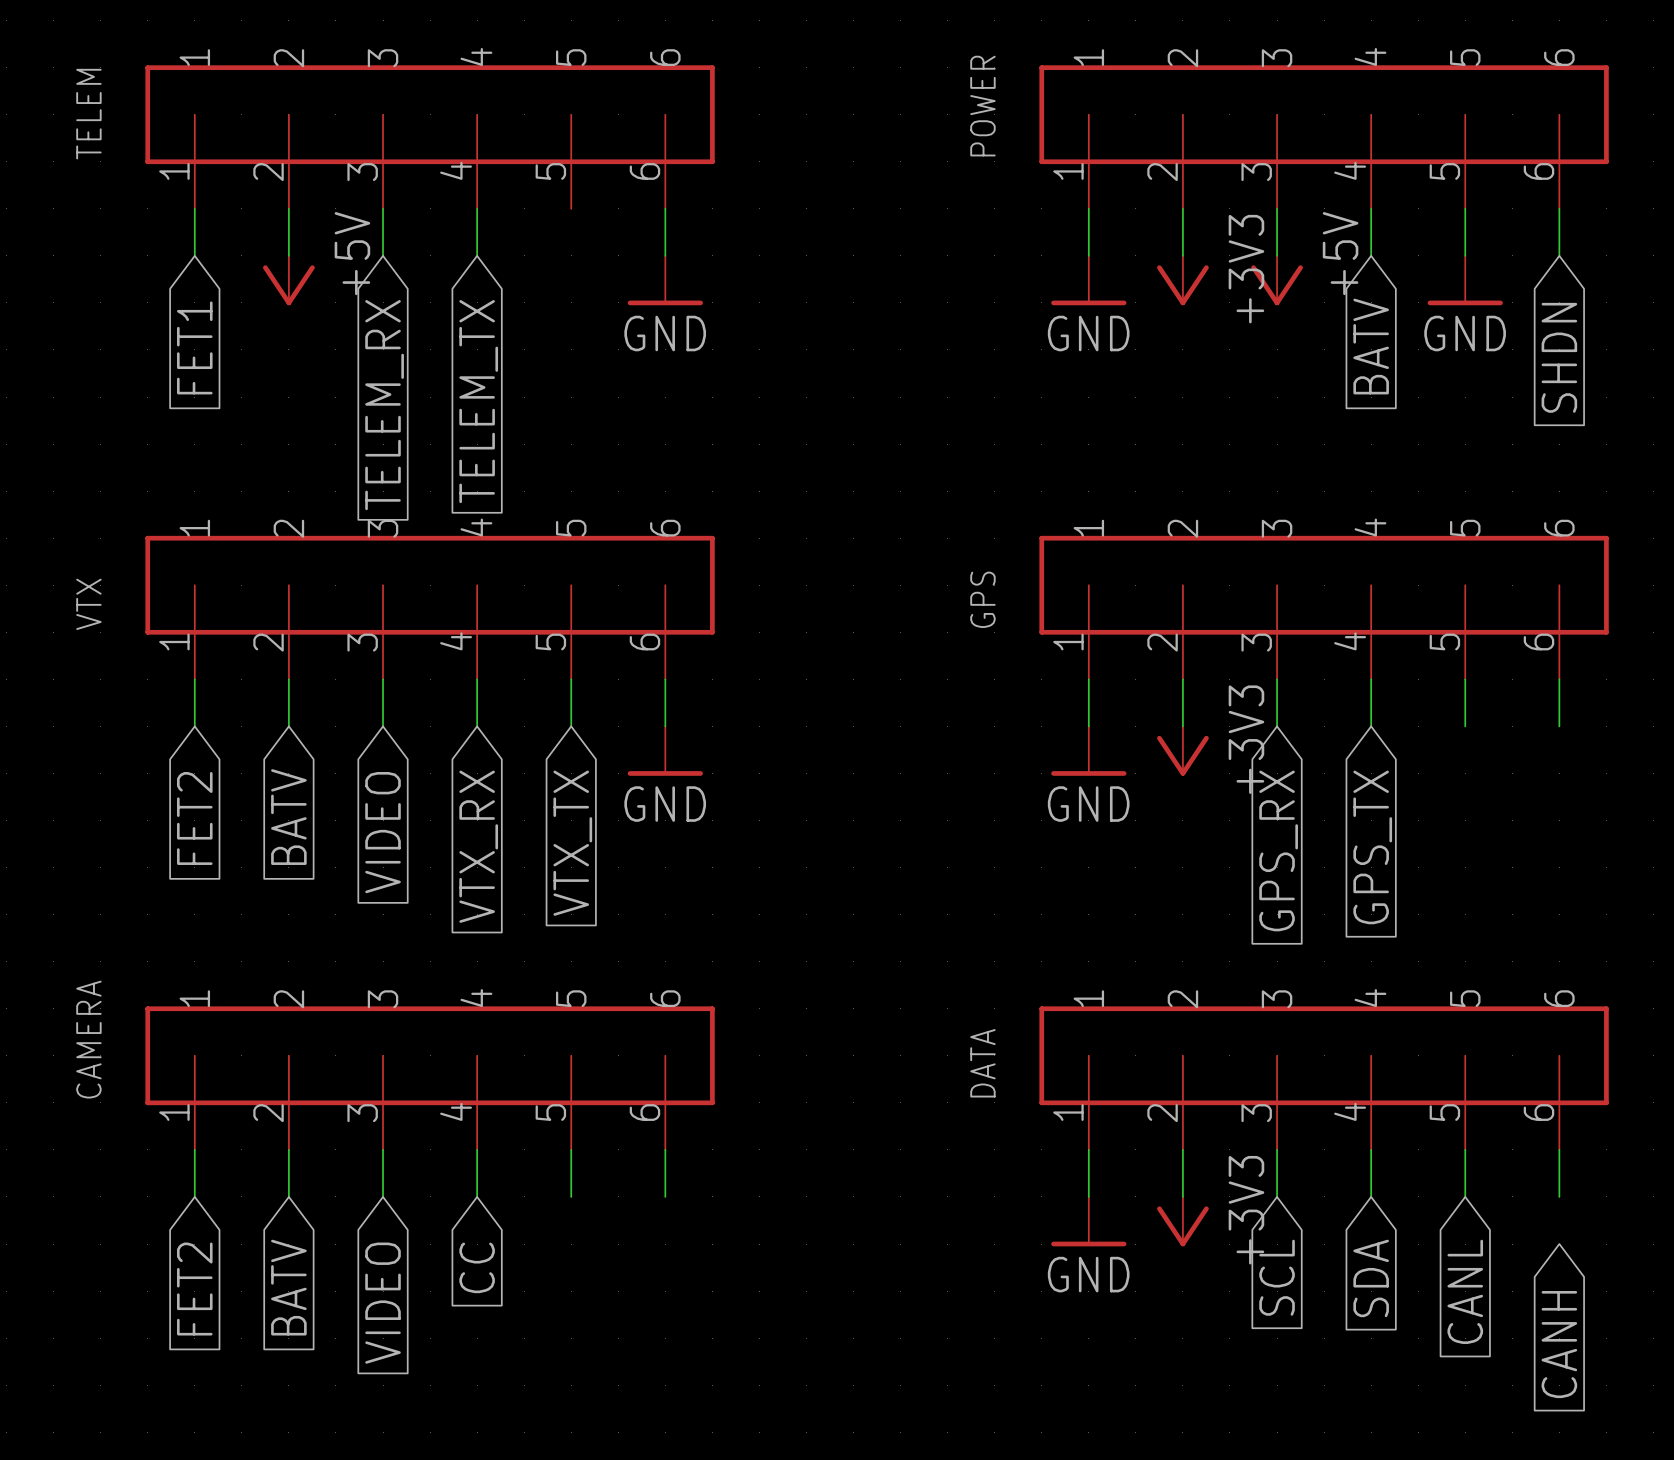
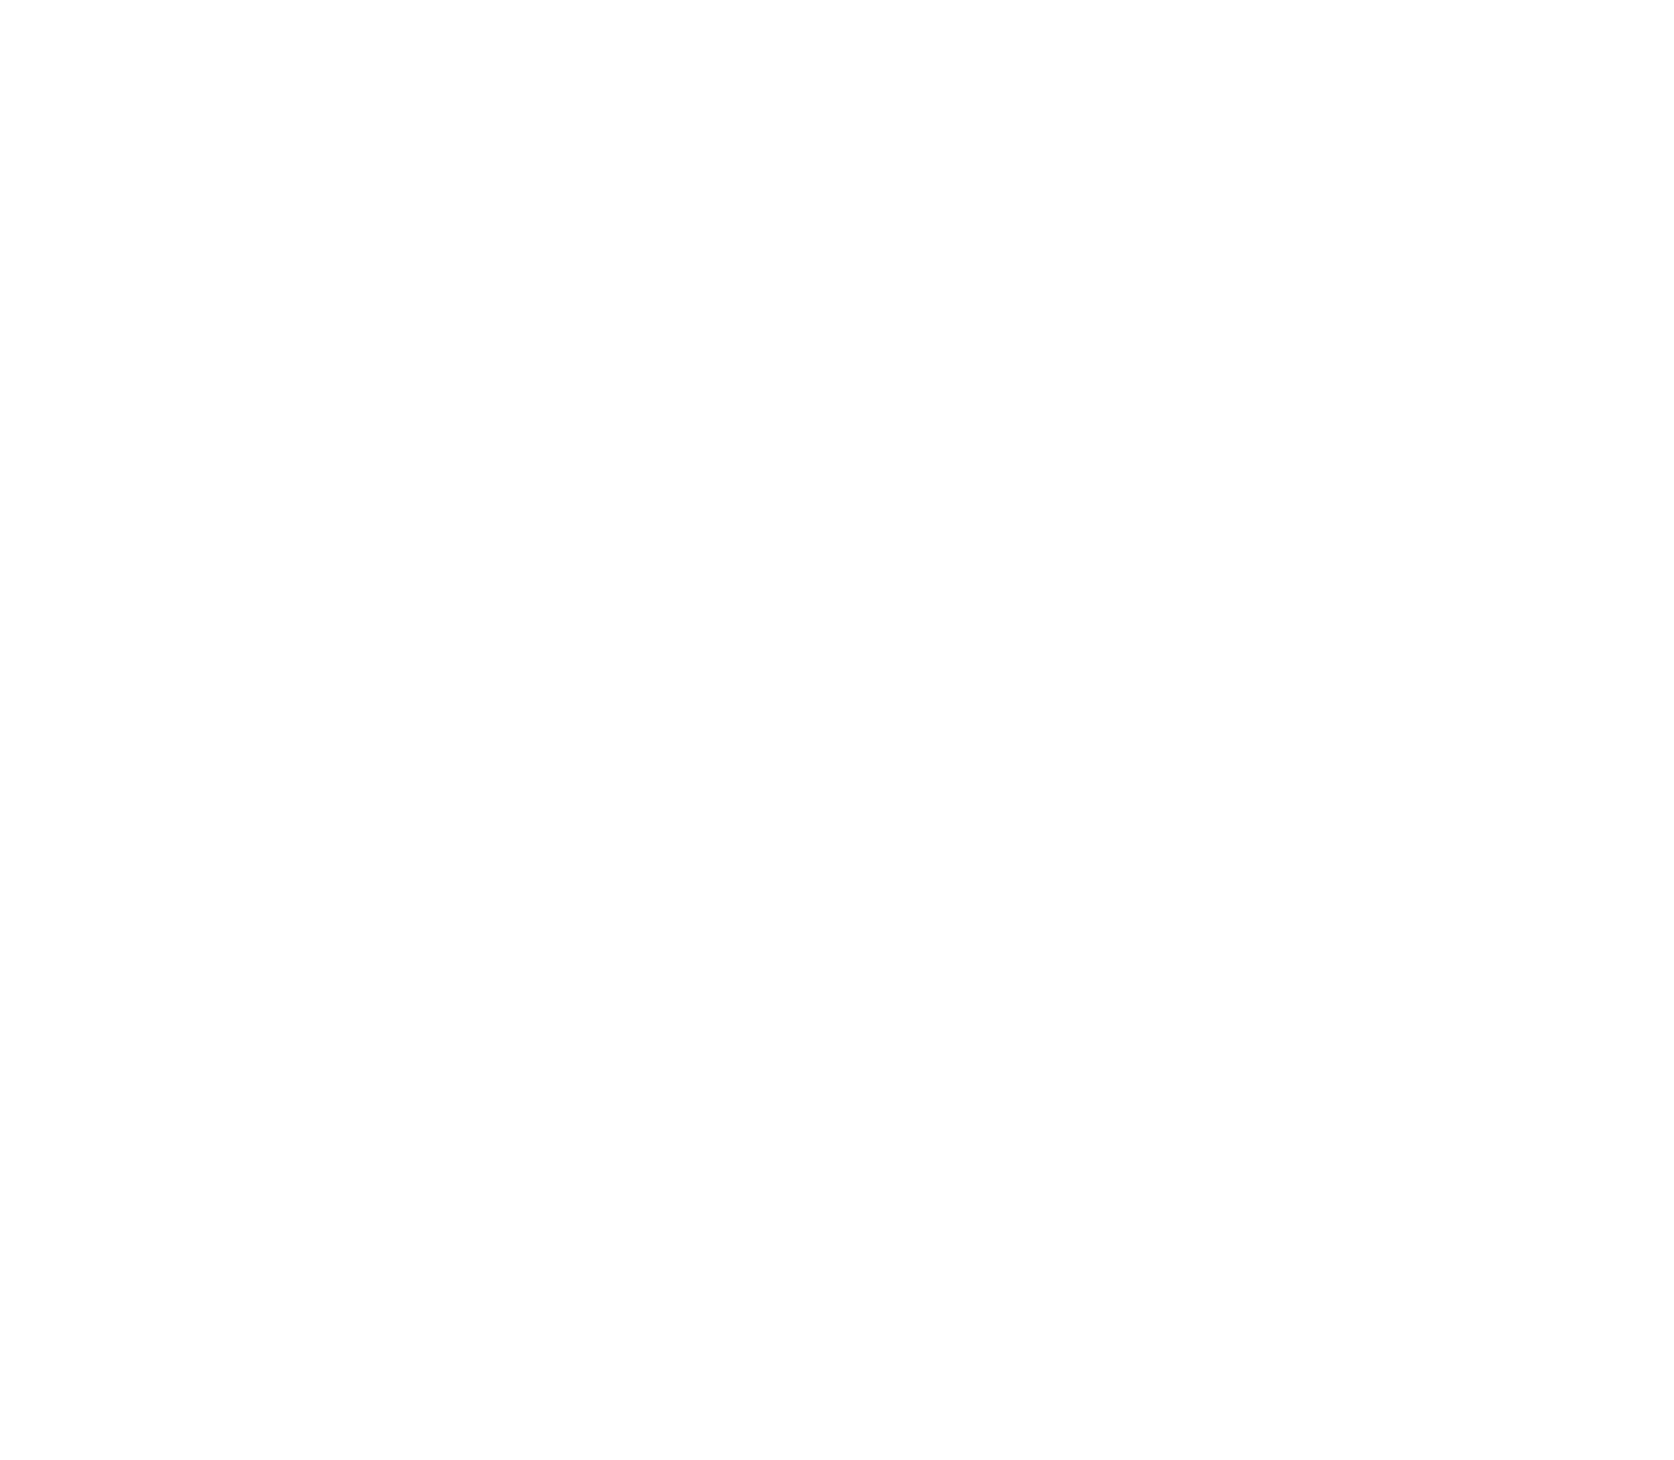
TELEM: (430, 137) -> none
POWER: (1324, 137) -> none
wire: (194, 208) (194, 255) -> none
wire: (288, 208) (288, 255) -> none
wire: (383, 208) (383, 255) -> none
wire: (477, 208) (477, 255) -> none
wire: (665, 208) (665, 255) -> none
wire: (1088, 208) (1088, 255) -> none
wire: (1182, 208) (1182, 255) -> none
wire: (1277, 208) (1277, 255) -> none
wire: (1371, 208) (1371, 255) -> none
wire: (1465, 208) (1465, 255) -> none
wire: (1559, 208) (1559, 255) -> none
power symbol: +5V (288, 280) -> none
power symbol: GND (665, 280) -> none
power symbol: GND (1088, 280) -> none
power symbol: +3V3 (1182, 280) -> none
power symbol: +5V (1277, 280) -> none
power symbol: GND (1465, 280) -> none
global label: BATV (1371, 346) -> none
global label: FET1 (194, 347) -> none
global label: SHDN (1559, 357) -> none
global label: TELEM_TX (478, 401) -> none
global label: TELEM_RX (384, 405) -> none
VTX: (430, 607) -> none
GPS: (1324, 607) -> none
wire: (194, 679) (194, 726) -> none
wire: (288, 679) (288, 726) -> none
wire: (383, 679) (383, 726) -> none
wire: (477, 679) (477, 726) -> none
wire: (571, 679) (571, 726) -> none
wire: (665, 679) (665, 726) -> none
wire: (1088, 679) (1088, 726) -> none
wire: (1182, 679) (1182, 726) -> none
wire: (1277, 679) (1277, 726) -> none
wire: (1371, 679) (1371, 726) -> none
wire: (1465, 679) (1465, 726) -> none
wire: (1559, 679) (1559, 726) -> none
power symbol: GND (665, 751) -> none
power symbol: GND (1088, 751) -> none
power symbol: +3V3 (1182, 751) -> none
global label: BATV (288, 817) -> none
global label: FET2 (194, 818) -> none
global label: VIDEO (383, 832) -> none
global label: VTX_TX (572, 843) -> none
global label: VTX_RX (478, 846) -> none
global label: GPS_TX (1372, 847) -> none
global label: GPS_RX (1278, 850) -> none
CAMERA: (430, 1078) -> none
DATA: (1324, 1078) -> none
wire: (194, 1149) (194, 1196) -> none
wire: (288, 1149) (288, 1196) -> none
wire: (383, 1149) (383, 1196) -> none
wire: (477, 1149) (477, 1196) -> none
wire: (571, 1149) (571, 1196) -> none
wire: (665, 1149) (665, 1196) -> none
wire: (1088, 1149) (1088, 1196) -> none
wire: (1182, 1149) (1182, 1196) -> none
wire: (1277, 1149) (1277, 1196) -> none
wire: (1371, 1149) (1371, 1196) -> none
wire: (1465, 1149) (1465, 1196) -> none
wire: (1559, 1149) (1559, 1196) -> none
power symbol: GND (1088, 1221) -> none
power symbol: +3V3 (1182, 1221) -> none
global label: CC (477, 1267) -> none
global label: SCL (1277, 1277) -> none
global label: SDA (1371, 1278) -> none
global label: BATV (288, 1287) -> none
global label: FET2 (194, 1289) -> none
global label: CANL (1465, 1291) -> none
global label: VIDEO (383, 1303) -> none
global label: CANH (1559, 1344) -> none

